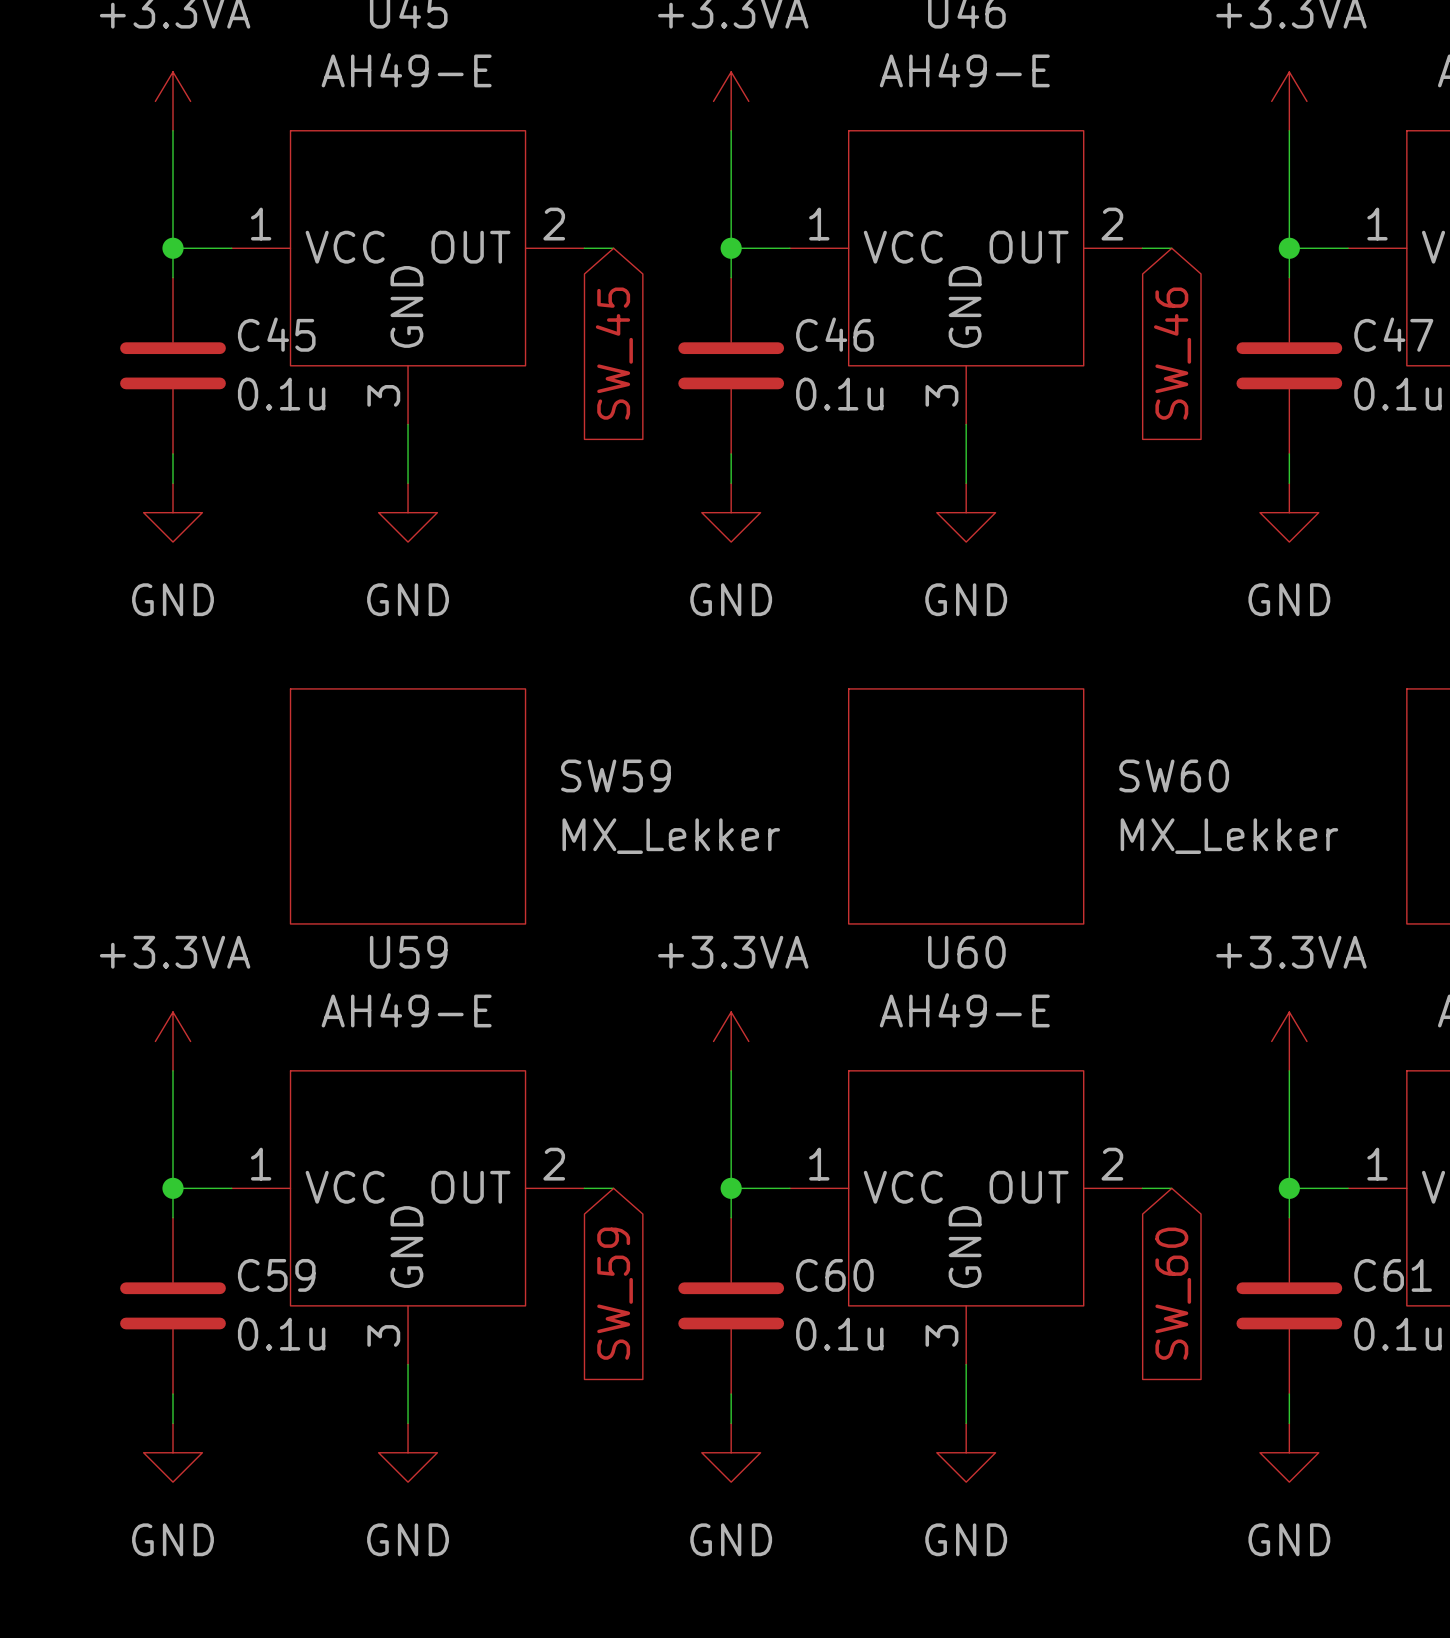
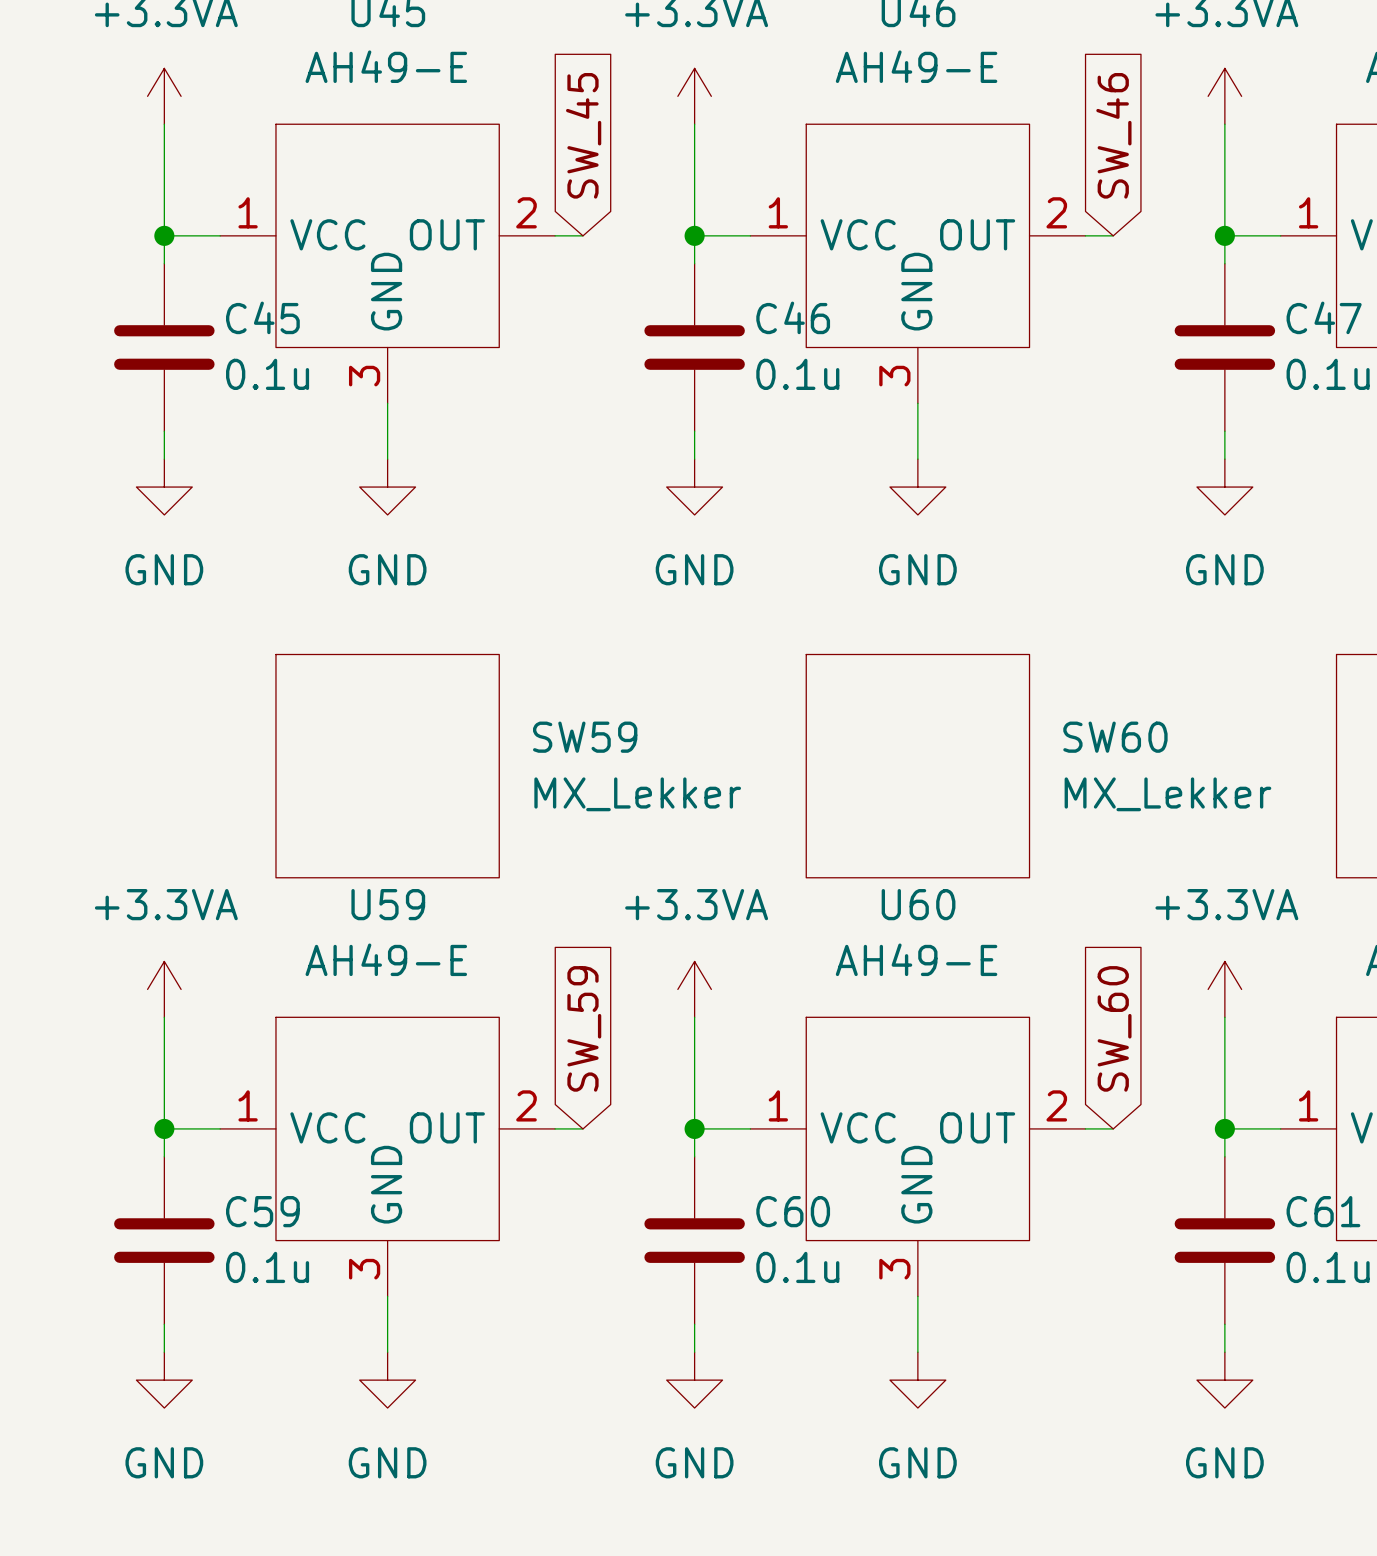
global label rotation: 0° (614, 353) -> 180° (583, 135)
global label rotation: 0° (1172, 353) -> 180° (1113, 135)
global label rotation: 0° (615, 1293) -> 180° (584, 1028)
global label rotation: 0° (1173, 1293) -> 180° (1114, 1028)

